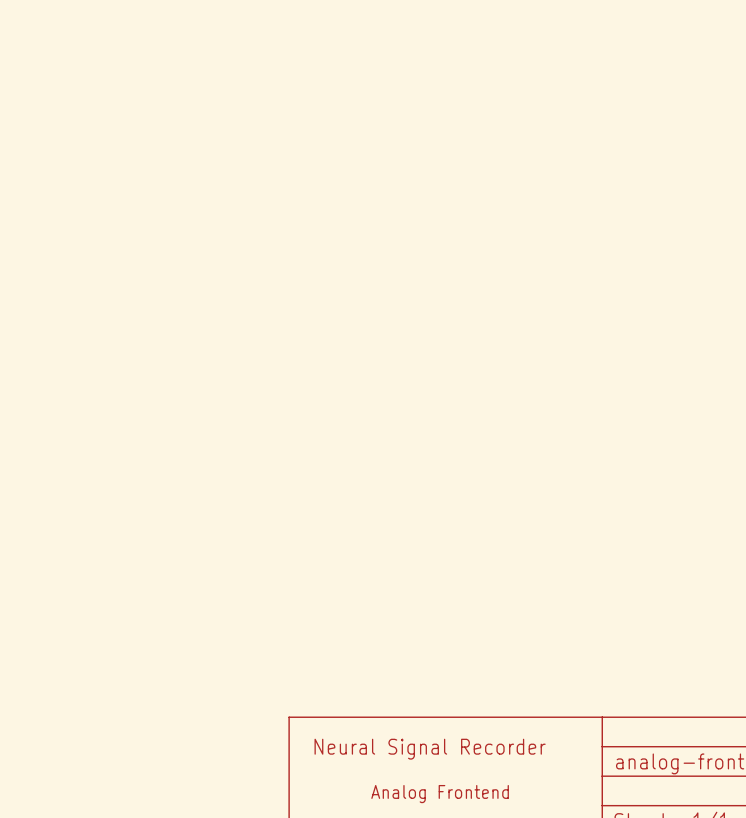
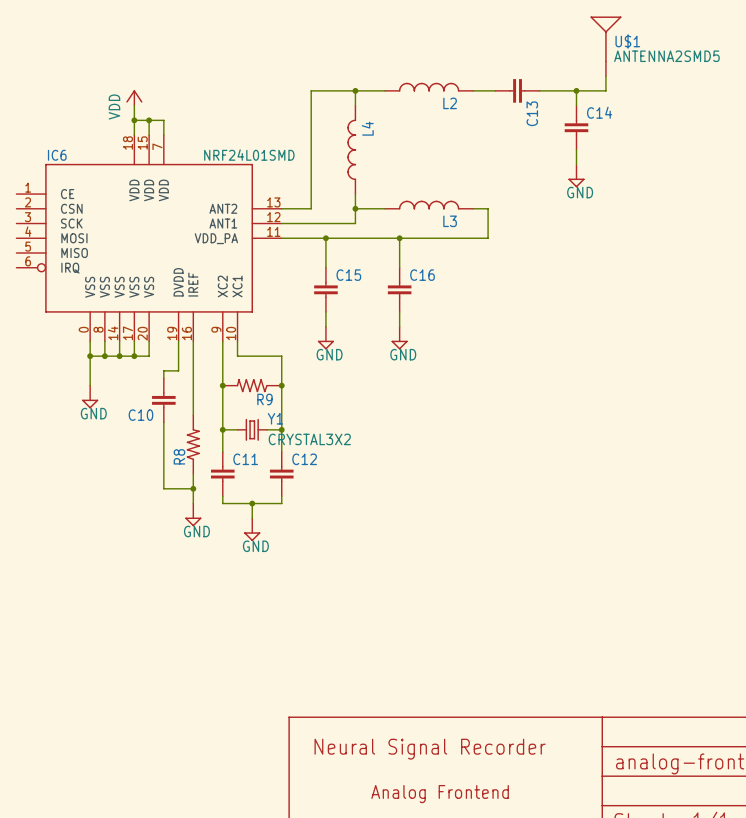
U$1: none -> ANTENNA2SMD5 (605, 46)
wire: none -> (605, 76) (605, 90) (539, 90)
L2: none -> (429, 87)
wire: none -> (355, 90) (355, 105)
junction: none -> (355, 90)
wire: none -> (384, 90) (311, 90) (311, 208) (281, 208)
wire: none -> (473, 90) (495, 90)
C13: none -> (517, 90)
wire: none -> (576, 90) (576, 105)
junction: none -> (576, 90)
power symbol: none -> VDD (134, 97)
wire: none -> (134, 105) (134, 135)
wire: none -> (134, 120) (163, 120) (163, 135)
junction: none -> (134, 120)
wire: none -> (149, 120) (149, 135)
junction: none -> (149, 120)
C14: none -> (576, 127)
L4: none -> (351, 149)
wire: none -> (576, 149) (576, 164)
power symbol: none -> GND (576, 175)
wire: none -> (355, 194) (355, 223) (281, 223)
L3: none -> (429, 205)
wire: none -> (355, 208) (384, 208)
junction: none -> (355, 208)
wire: none -> (473, 208) (488, 208) (488, 238) (281, 238)
IC6: none -> NRF24L01SMD (149, 238)
wire: none -> (325, 238) (325, 267)
junction: none -> (325, 238)
wire: none -> (399, 238) (399, 267)
junction: none -> (399, 238)
C15: none -> (325, 289)
C16: none -> (399, 289)
wire: none -> (325, 311) (325, 326)
wire: none -> (399, 311) (399, 326)
power symbol: none -> GND (325, 338)
power symbol: none -> GND (399, 338)
wire: none -> (90, 341) (90, 385)
wire: none -> (104, 341) (104, 356)
wire: none -> (119, 341) (119, 356)
wire: none -> (134, 341) (134, 356)
wire: none -> (149, 341) (149, 356) (90, 356)
wire: none -> (178, 341) (178, 370) (163, 370) (163, 378)
wire: none -> (193, 341) (193, 415)
wire: none -> (222, 341) (222, 451)
wire: none -> (237, 341) (237, 356) (281, 356) (281, 451)
junction: none -> (90, 356)
junction: none -> (104, 356)
junction: none -> (119, 356)
junction: none -> (134, 356)
junction: none -> (222, 385)
R9: none -> (252, 385)
junction: none -> (281, 385)
power symbol: none -> GND (90, 397)
C10: none -> (163, 400)
wire: none -> (163, 422) (163, 488) (193, 488)
wire: none -> (222, 429) (237, 429)
junction: none -> (222, 429)
Y1: none -> CRYSTAL3X2 (252, 429)
wire: none -> (267, 429) (281, 429)
junction: none -> (281, 429)
R8: none -> (193, 444)
wire: none -> (193, 474) (193, 503)
C11: none -> (222, 474)
C12: none -> (281, 474)
junction: none -> (193, 488)
wire: none -> (222, 496) (222, 503) (281, 503) (281, 496)
wire: none -> (252, 503) (252, 518)
junction: none -> (252, 503)
power symbol: none -> GND (193, 514)
power symbol: none -> GND (252, 529)

